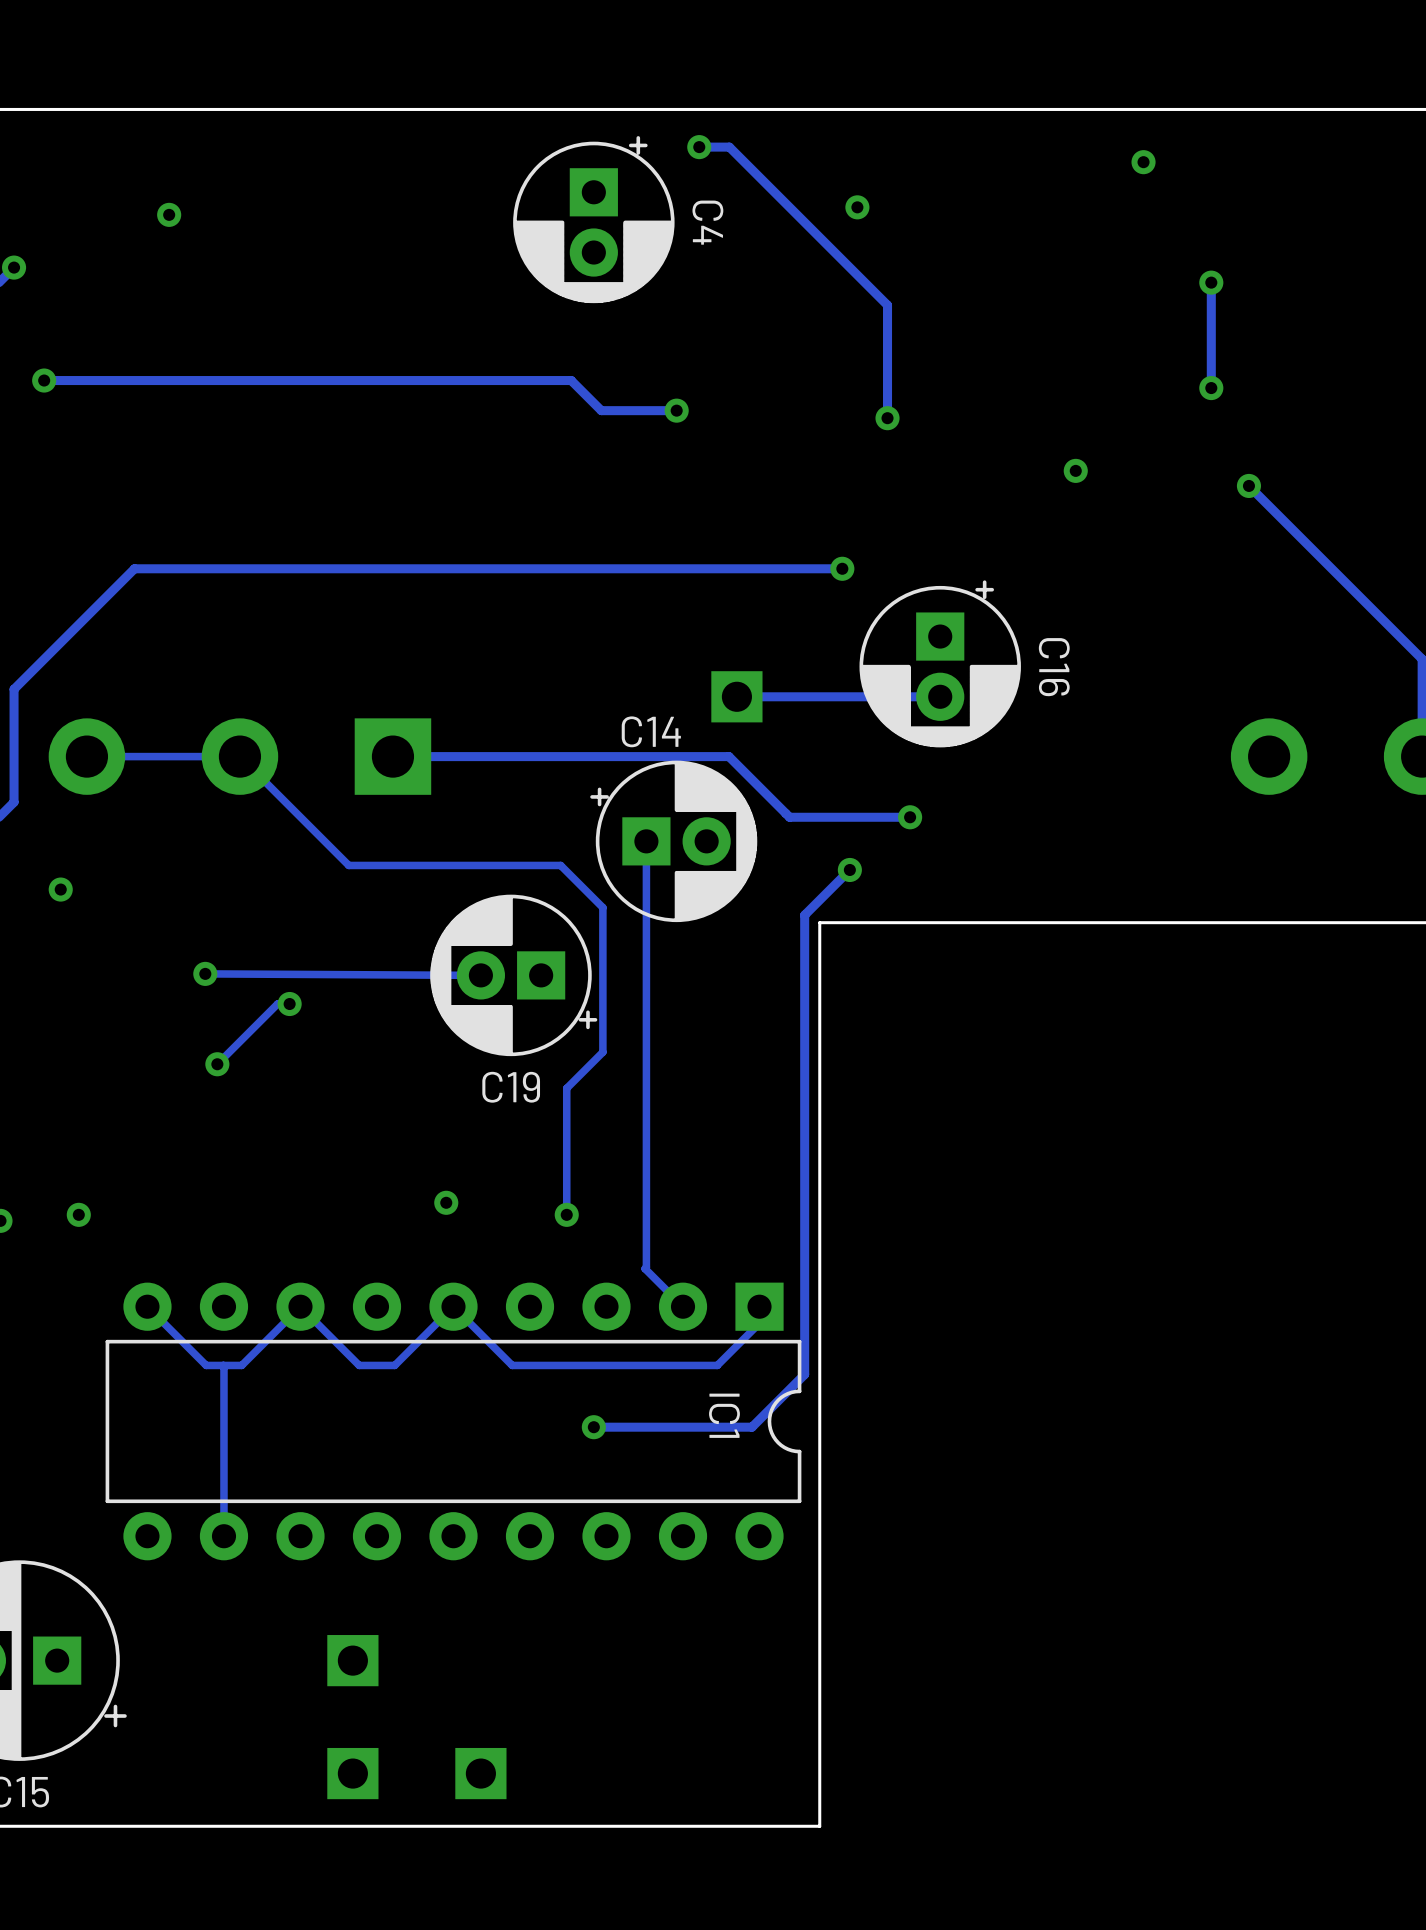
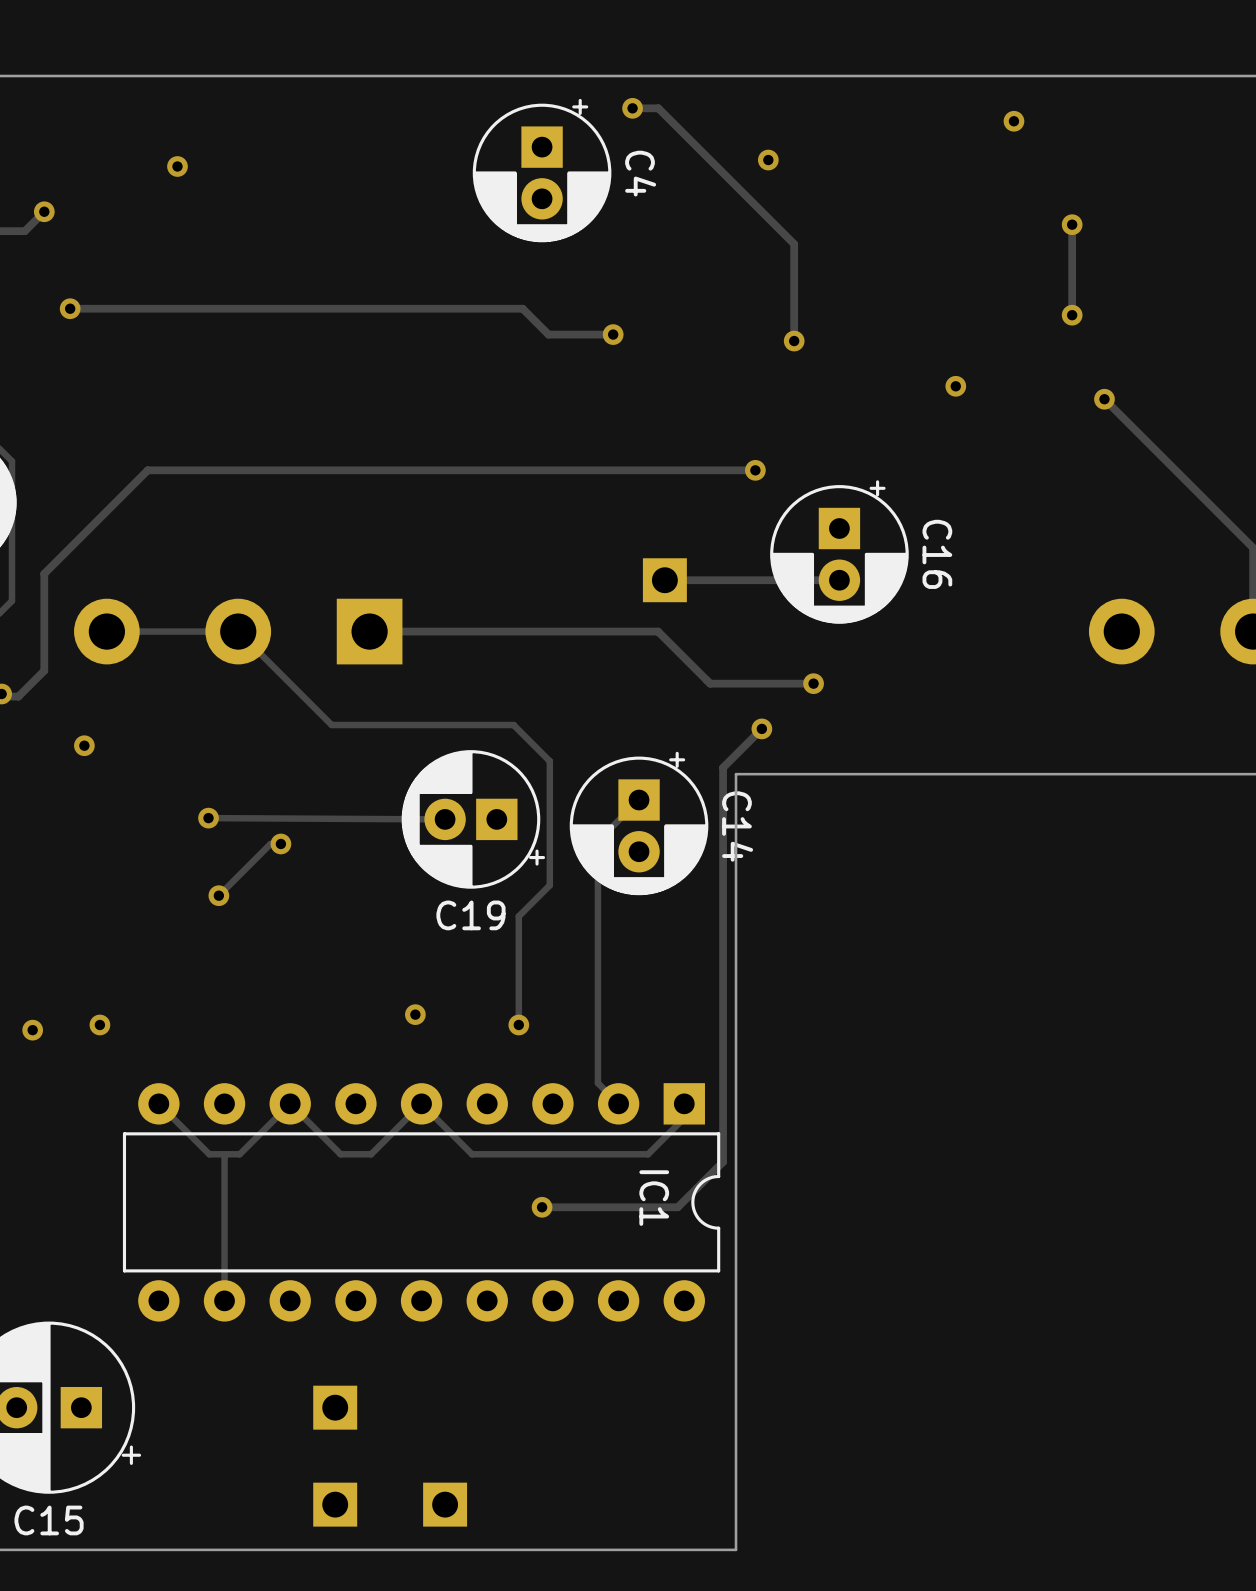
track: (646, 841) (645, 1268) (658, 1282) -> (639, 800) (597, 841) (597, 1083)
C14 rotation: 0° (673, 841) -> 90° clockwise (639, 823)
C14 position: (673, 841) -> (639, 823)

